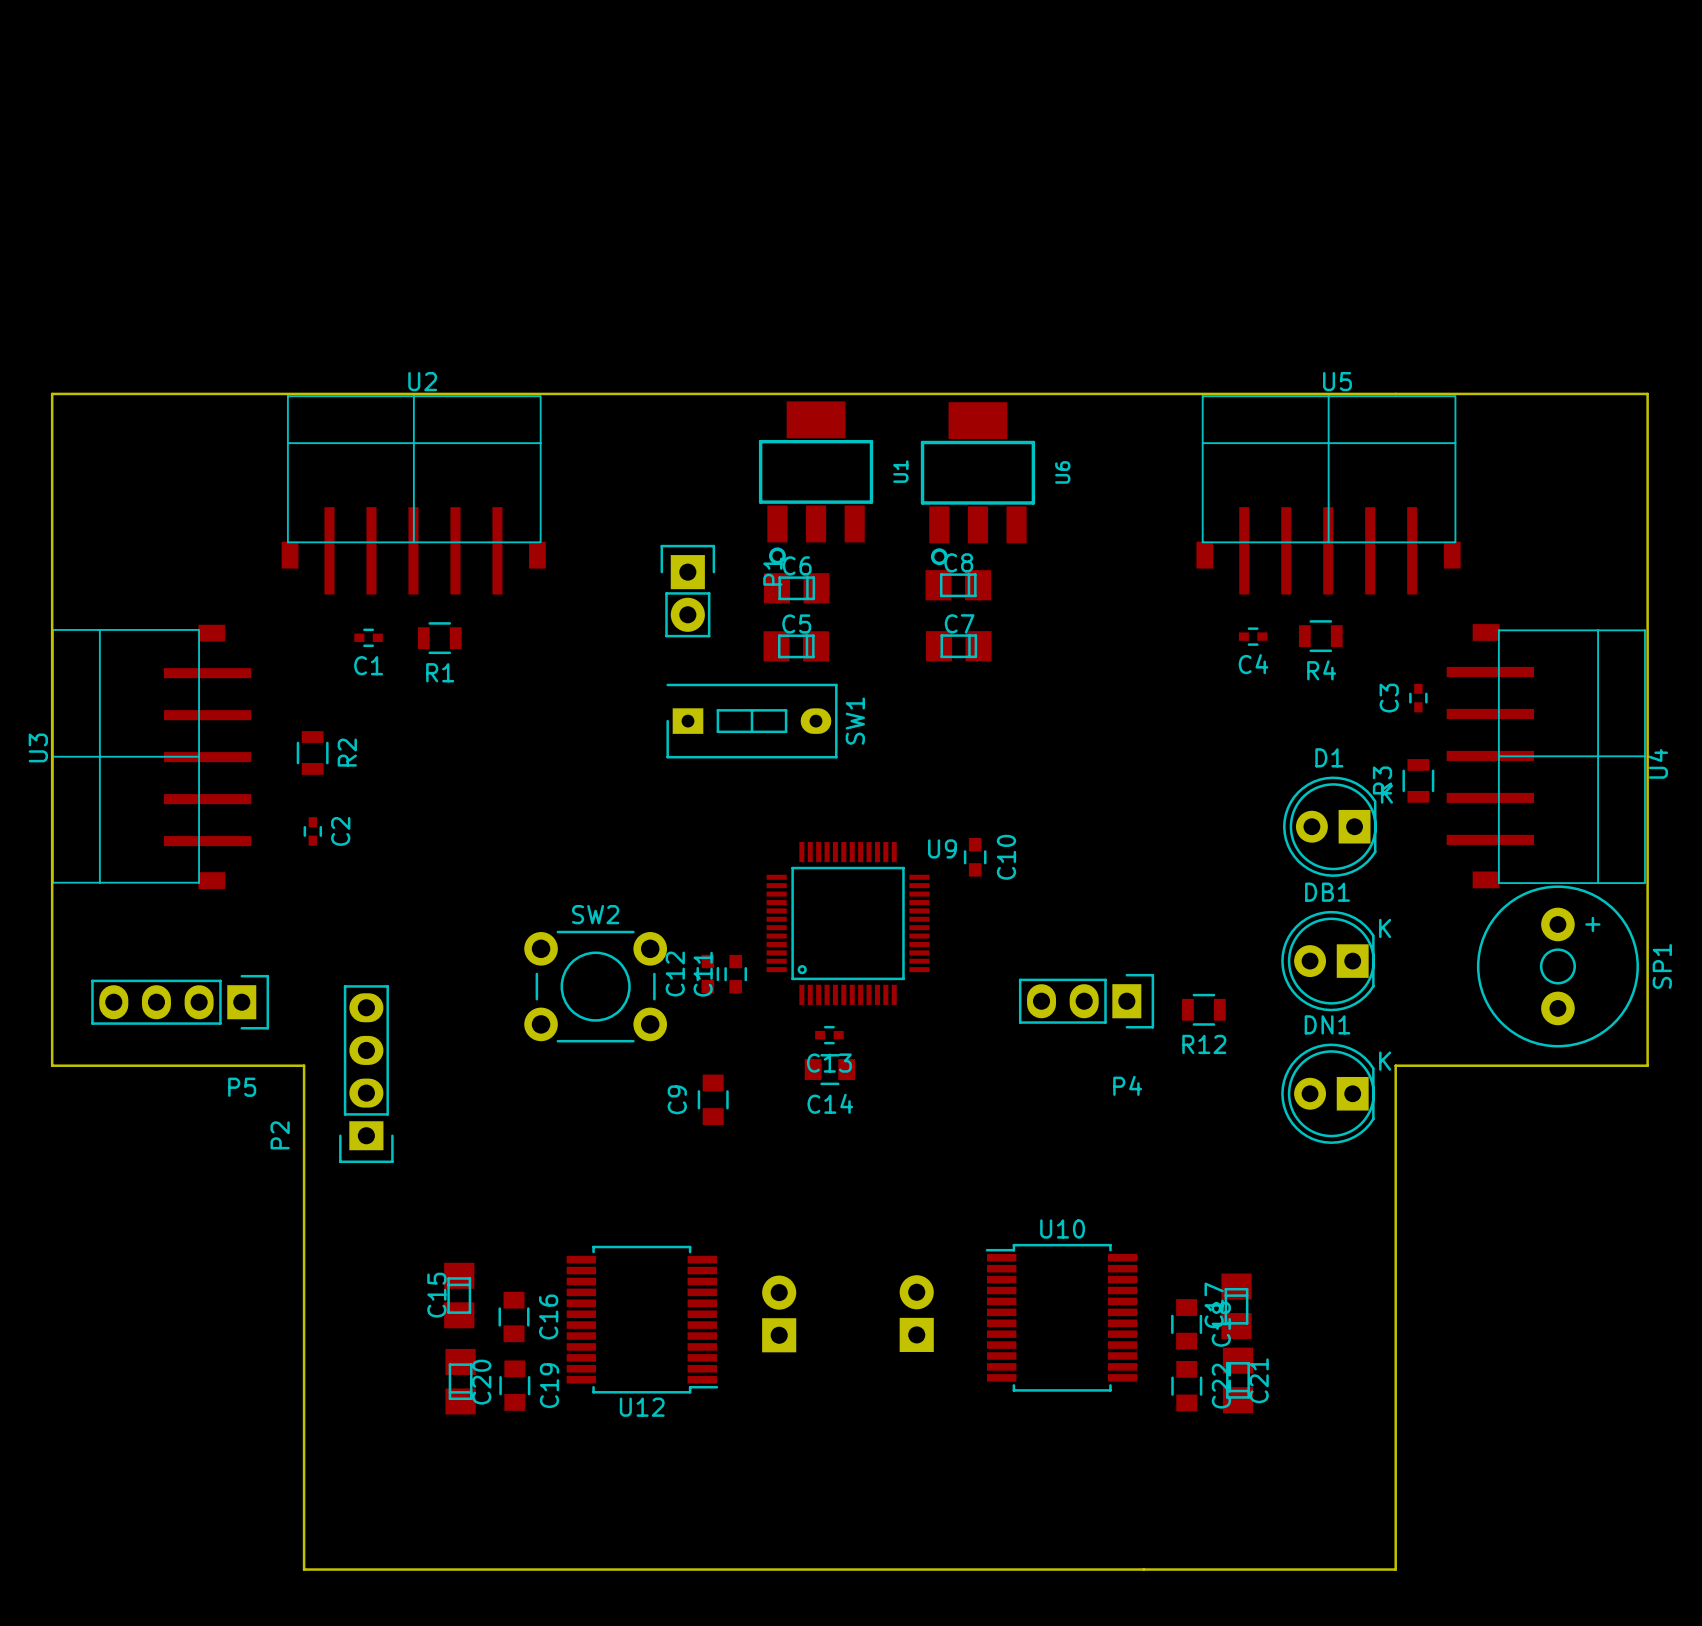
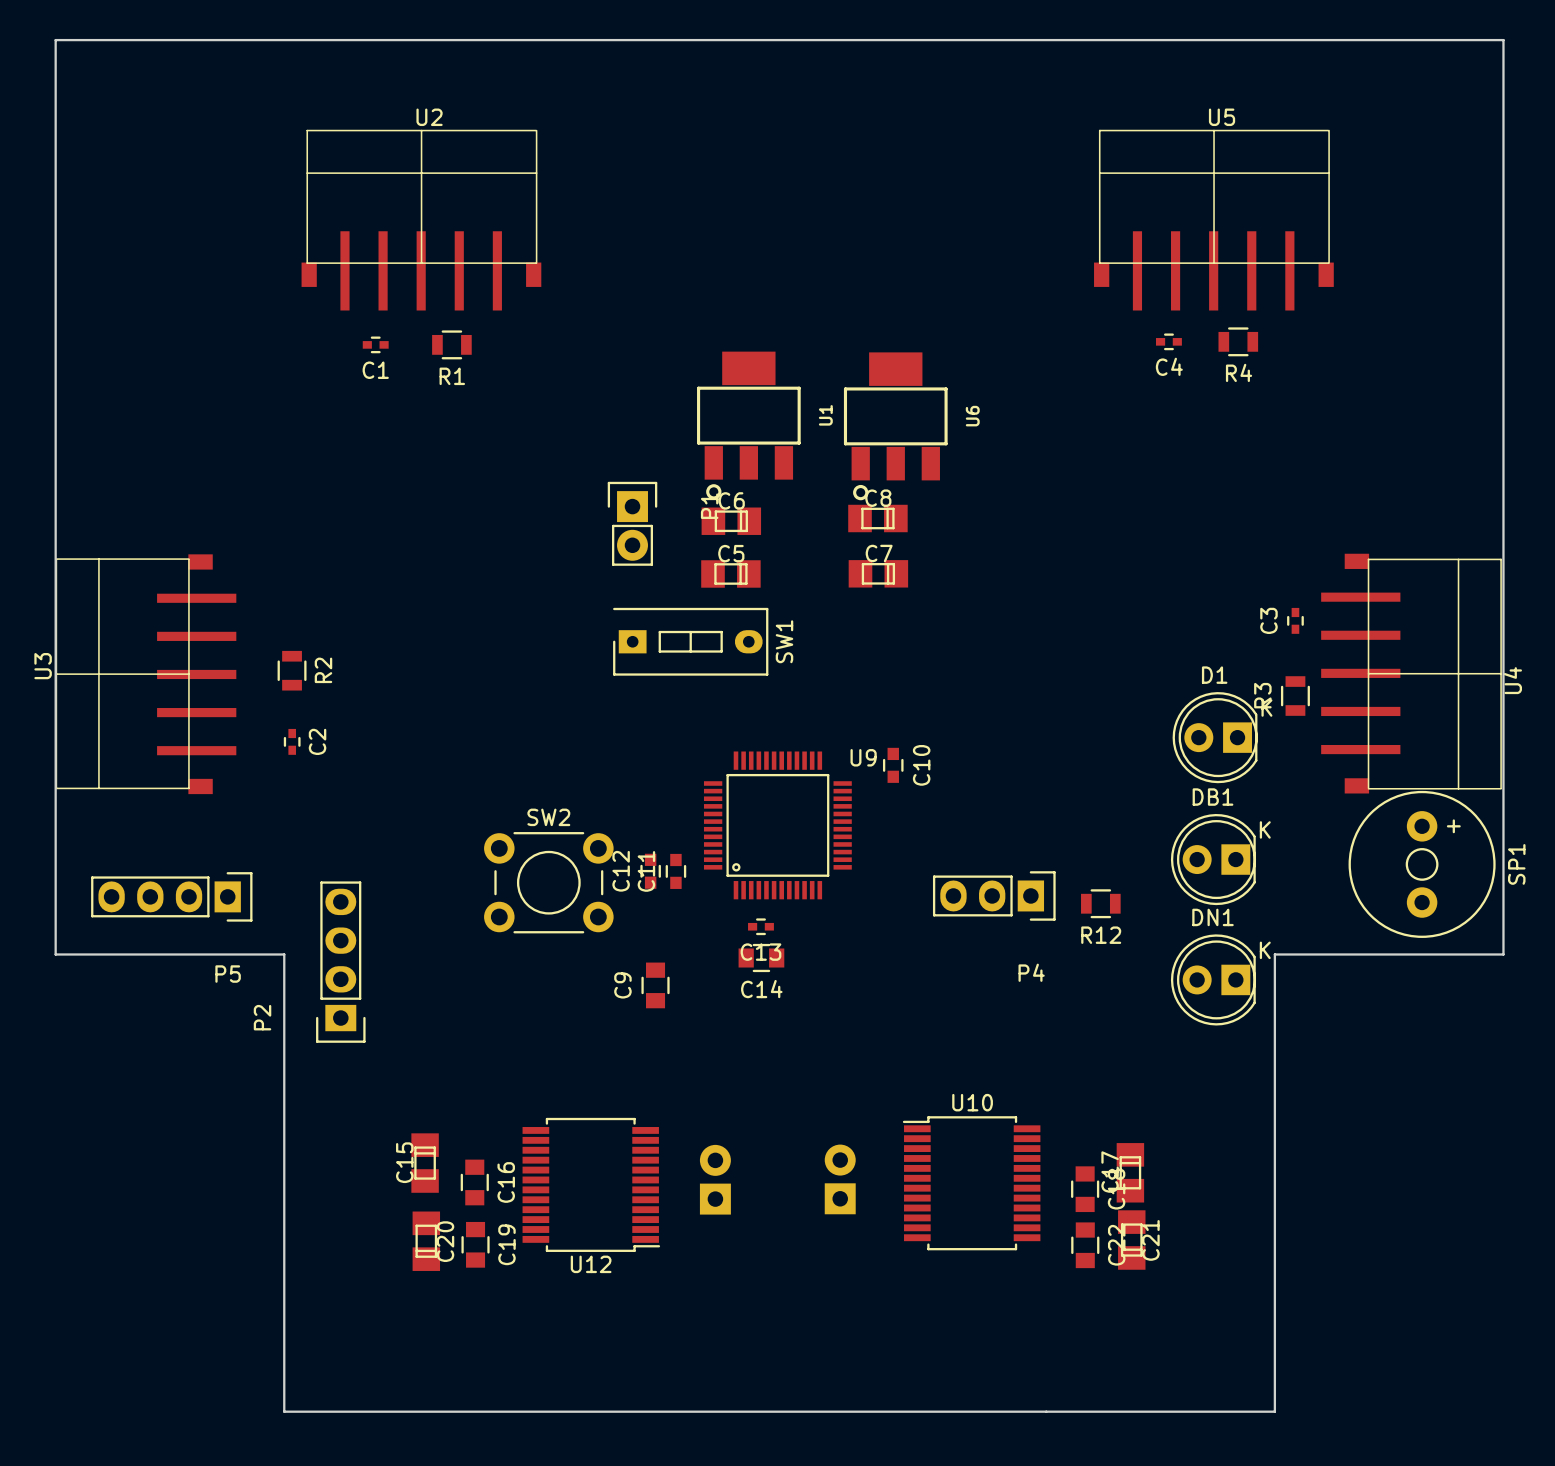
board edge: (52, 393) (1647, 393) -> (55, 344) (55, 40) (1503, 40) (1503, 344)
U2 position: (413, 494) -> (421, 220)
U5 position: (1328, 494) -> (1213, 220)
C4 position: (1253, 636) -> (1168, 341)
R4 position: (1320, 636) -> (1238, 341)
C1 position: (368, 637) -> (375, 344)
R1 position: (439, 638) -> (451, 344)

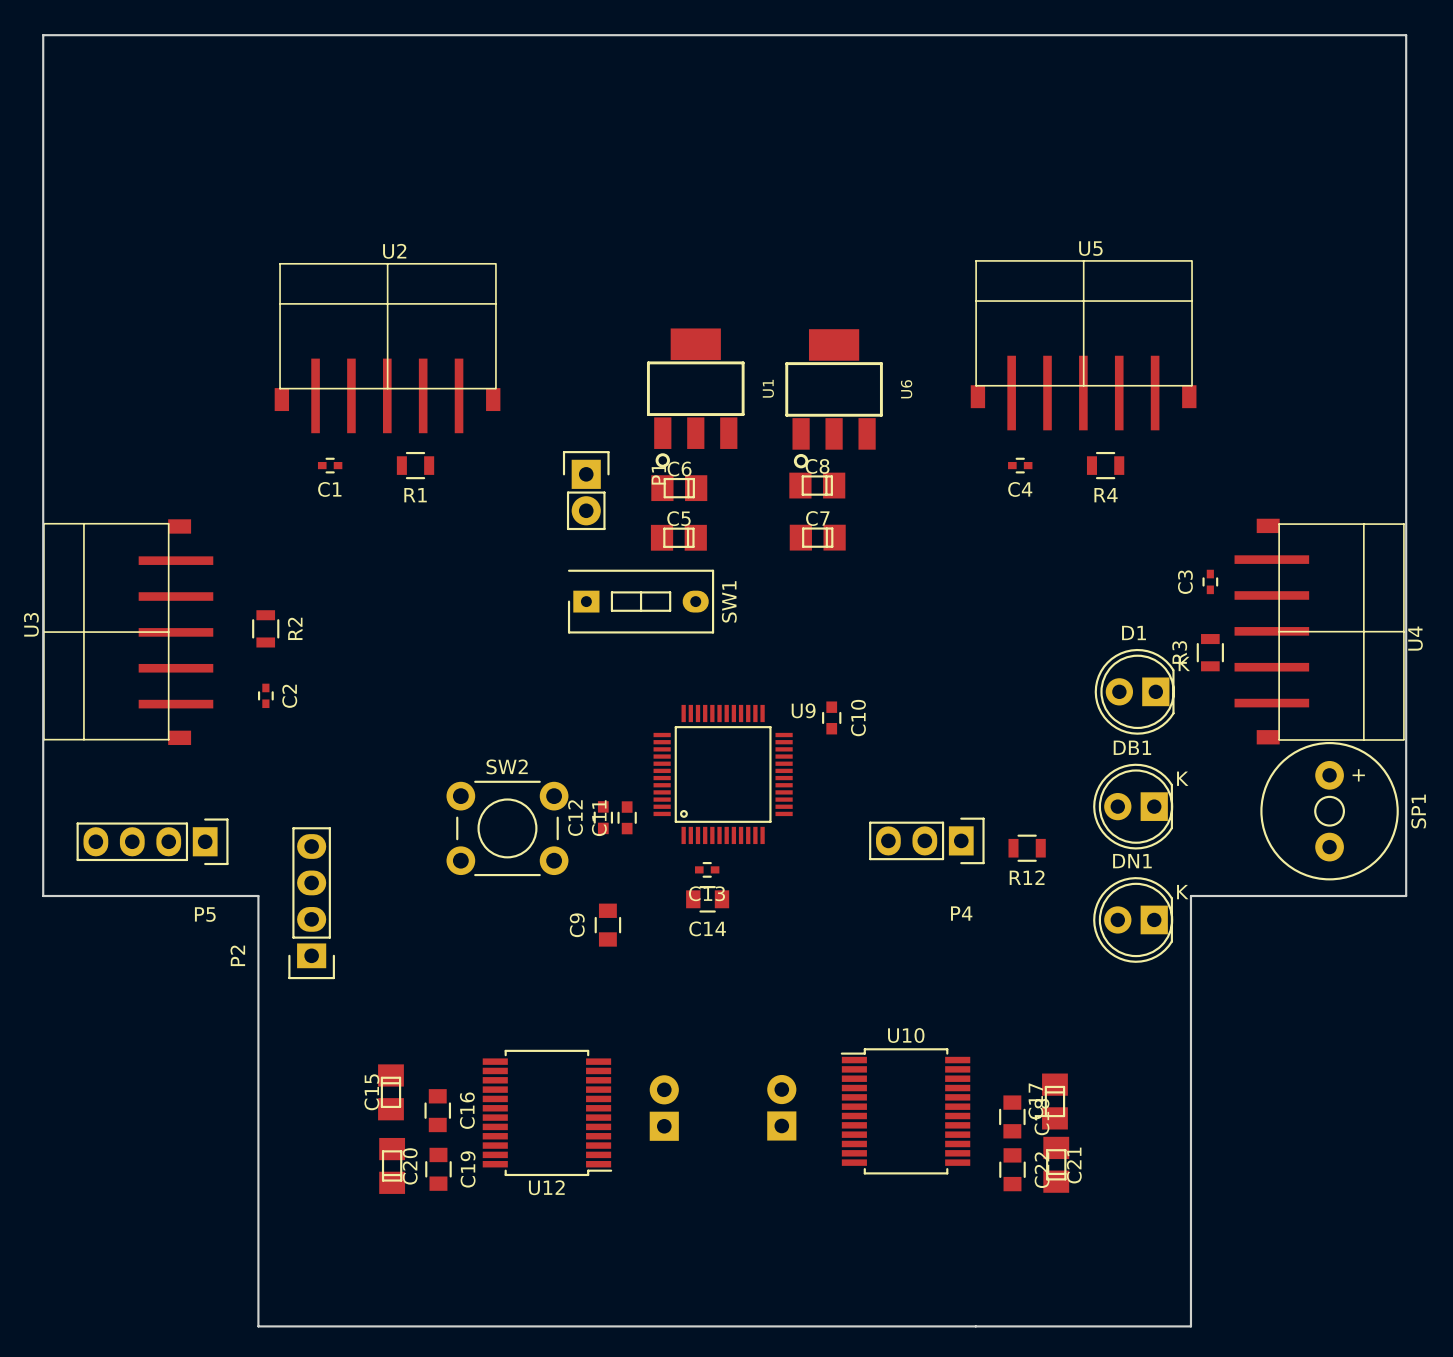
U2 position: (421, 220) -> (387, 348)
U5 position: (1213, 220) -> (1083, 345)
C4 position: (1168, 341) -> (1020, 465)
R4 position: (1238, 341) -> (1105, 465)
C1 position: (375, 344) -> (330, 465)
R1 position: (451, 344) -> (415, 465)

